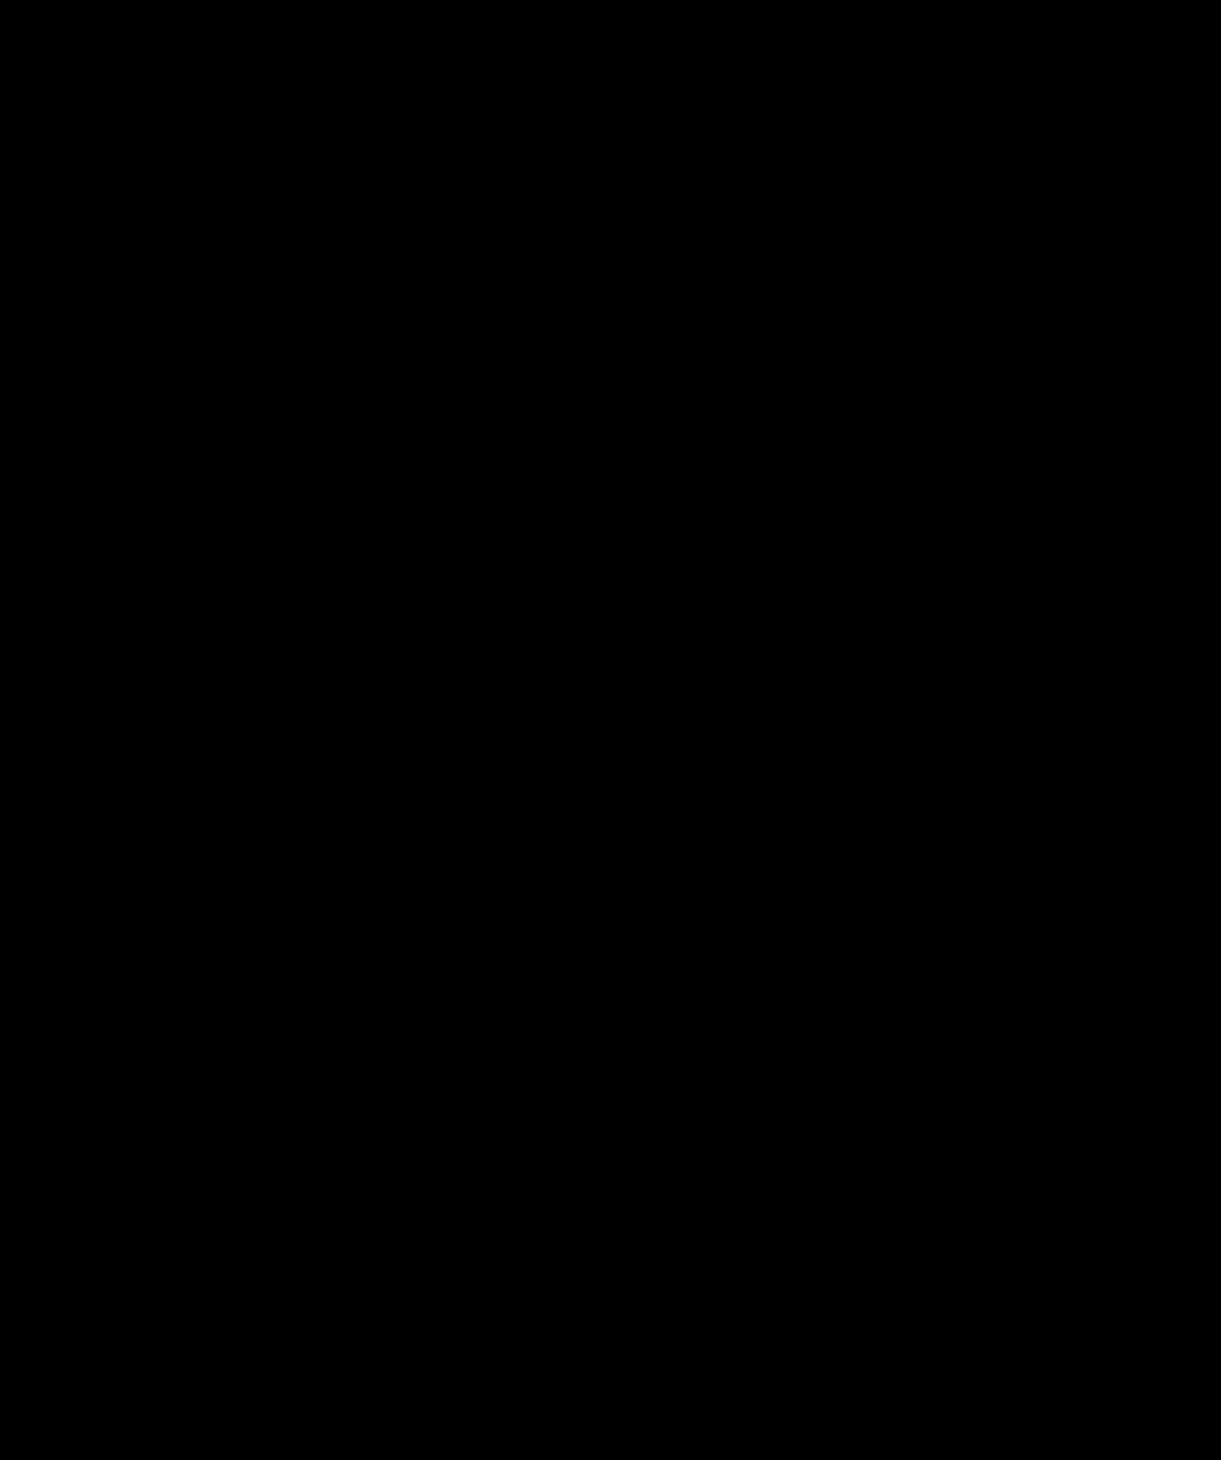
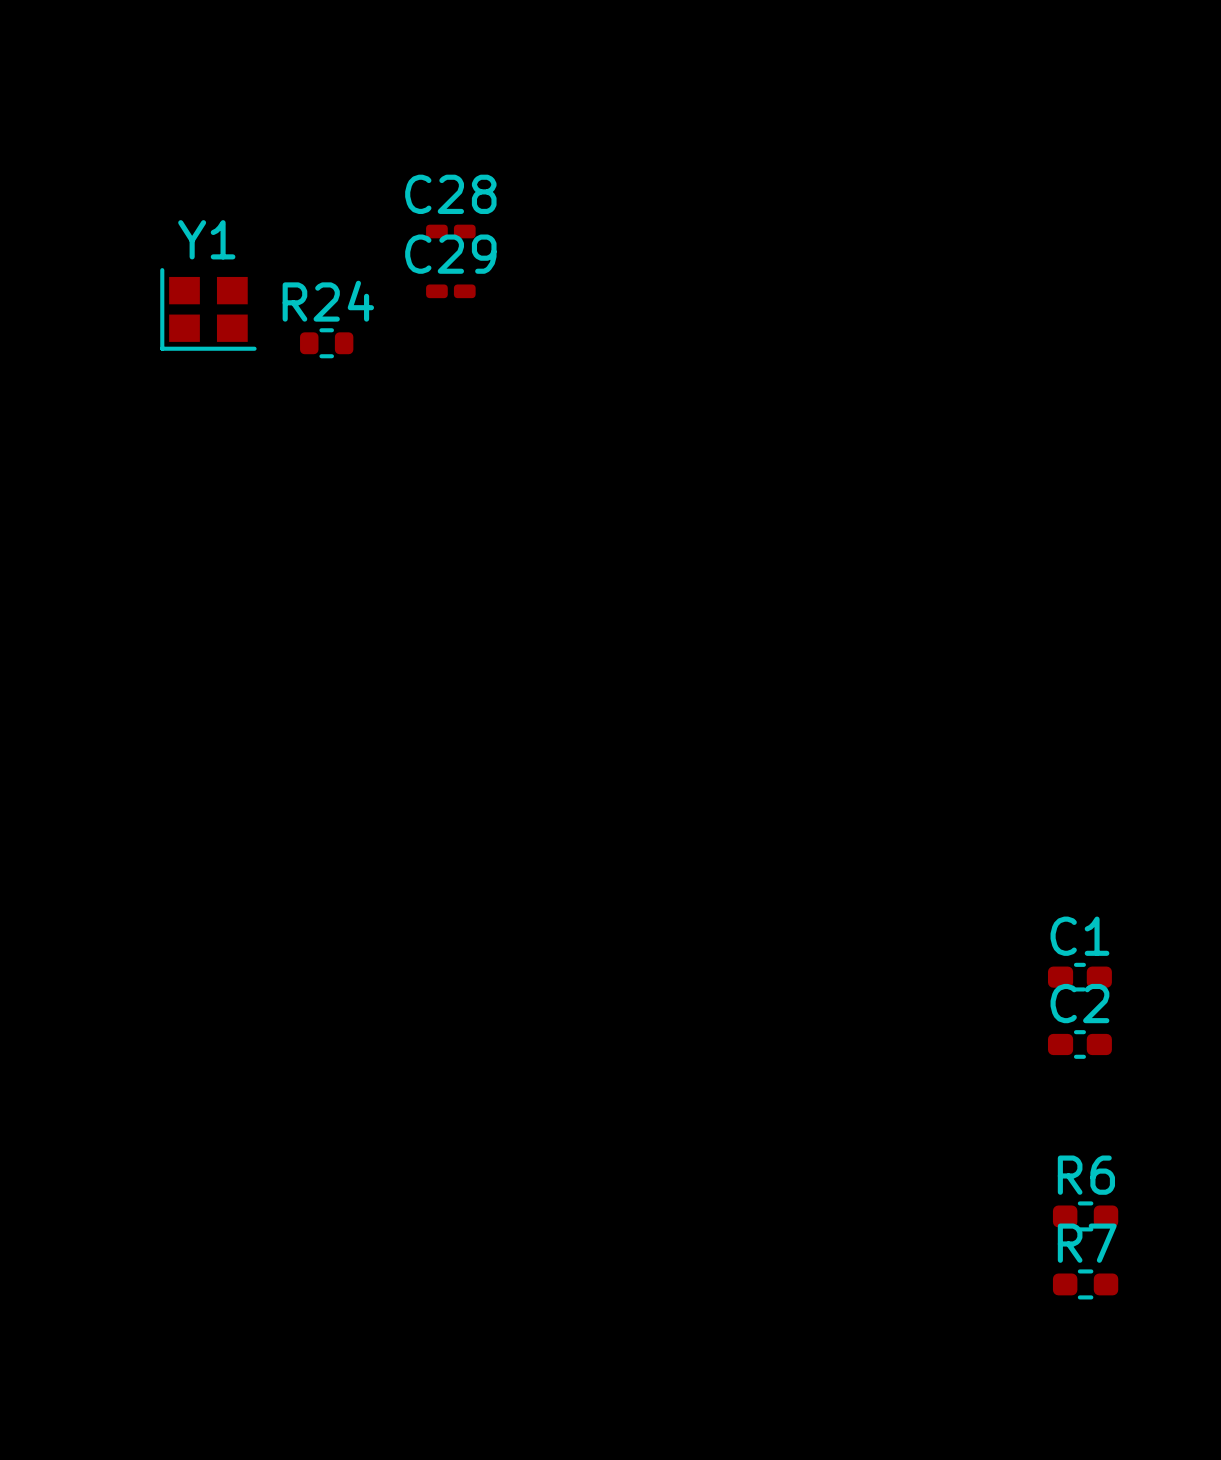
C28: none -> (450, 231)
C29: none -> (450, 291)
Y1: none -> (208, 309)
R24: none -> (326, 343)
C1: none -> (1079, 977)
C2: none -> (1079, 1044)
R6: none -> (1085, 1216)
R7: none -> (1085, 1284)

